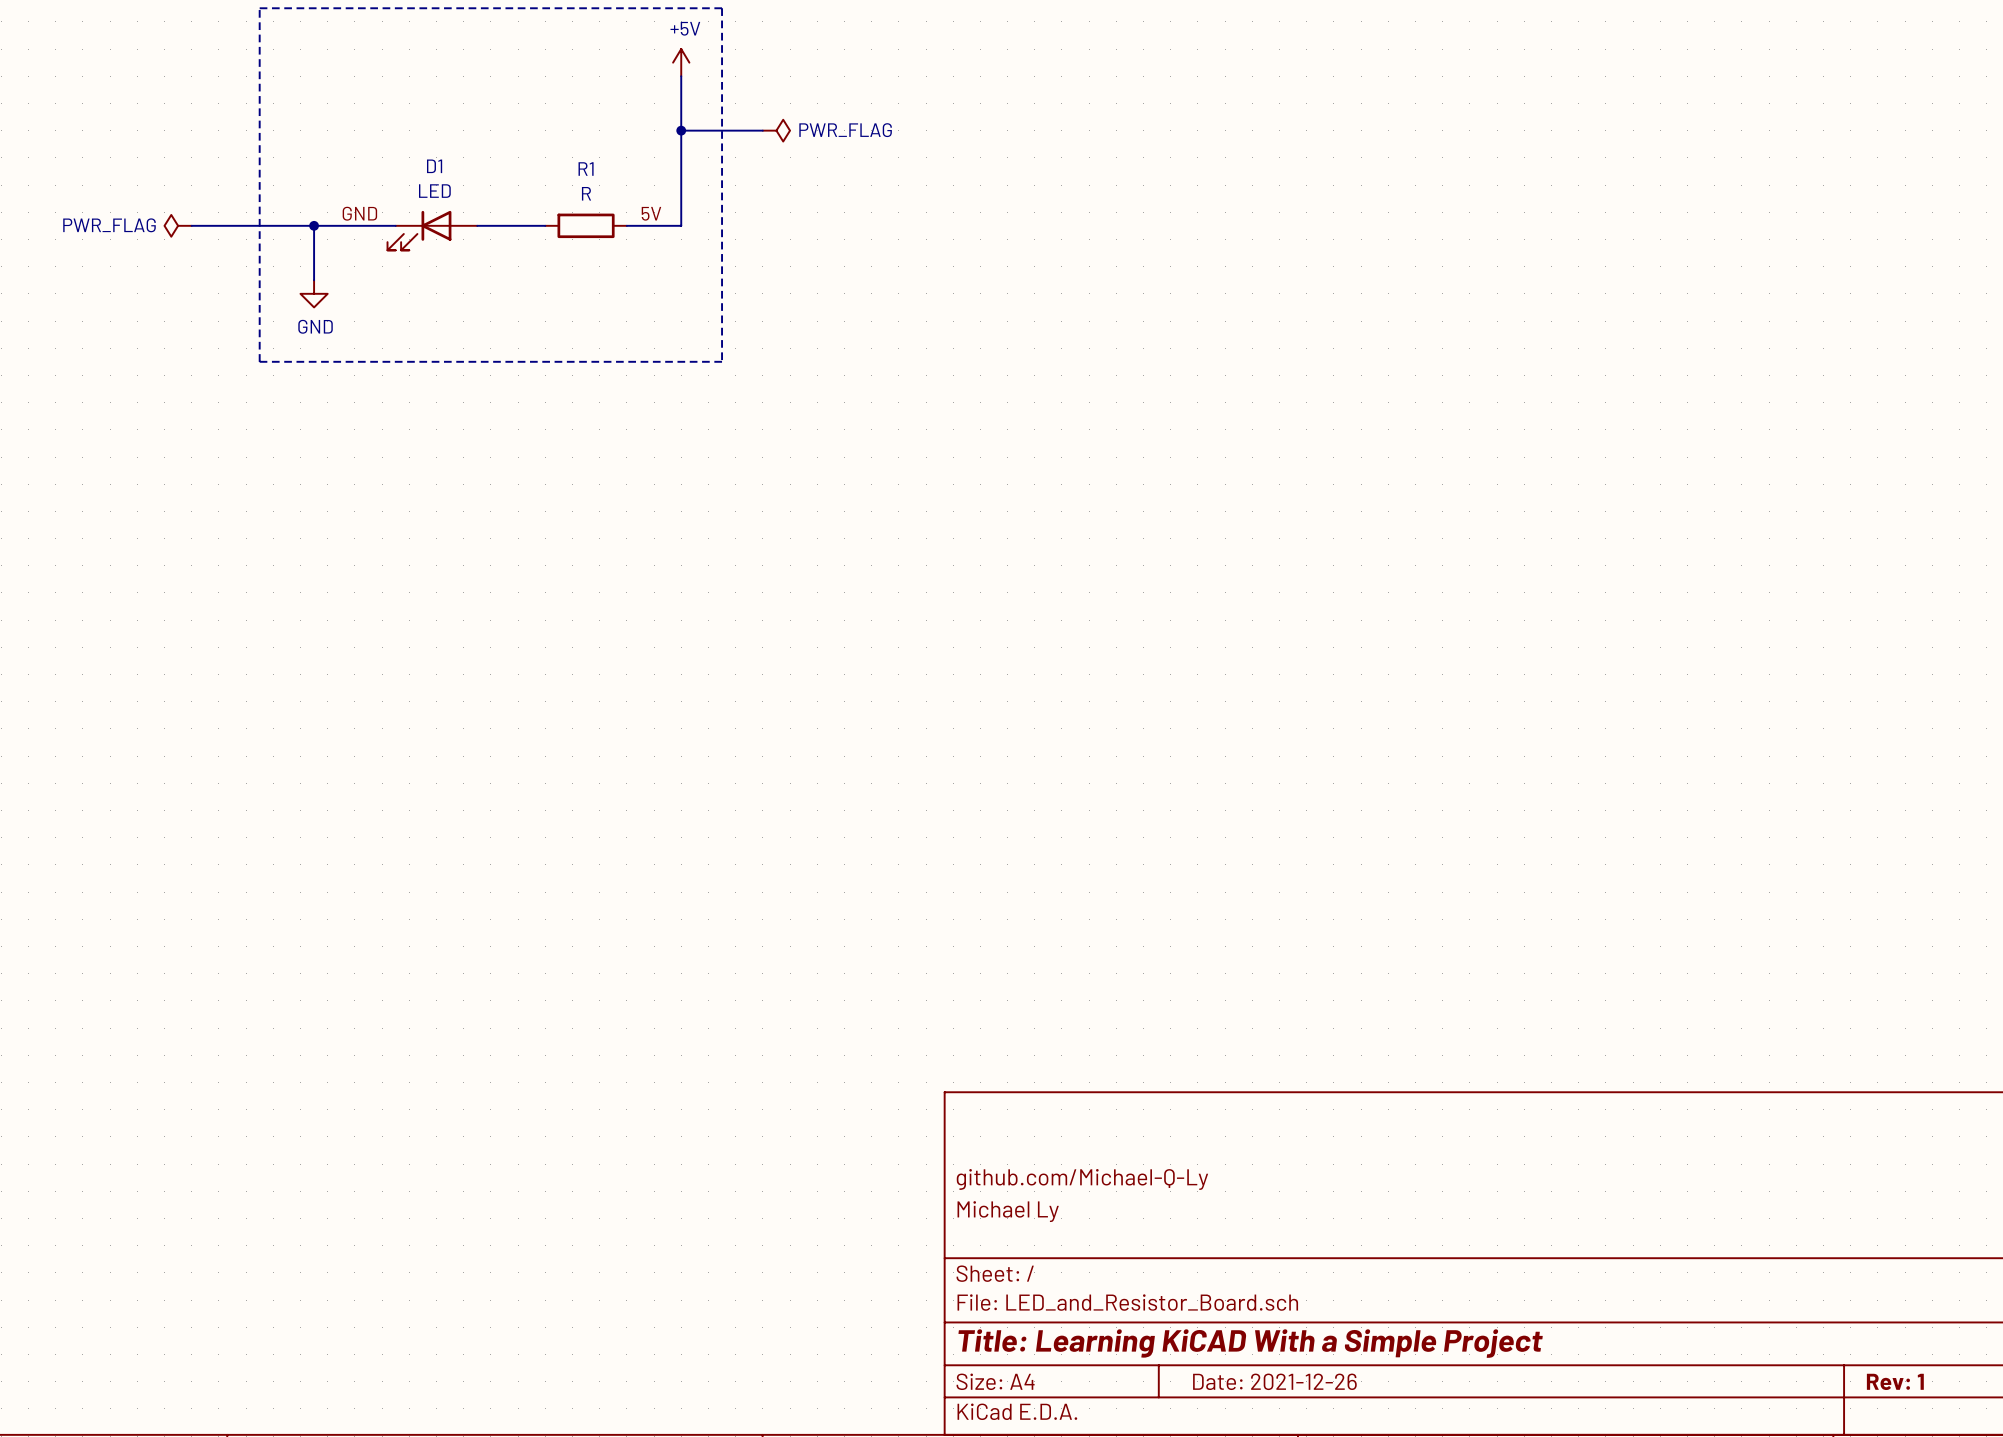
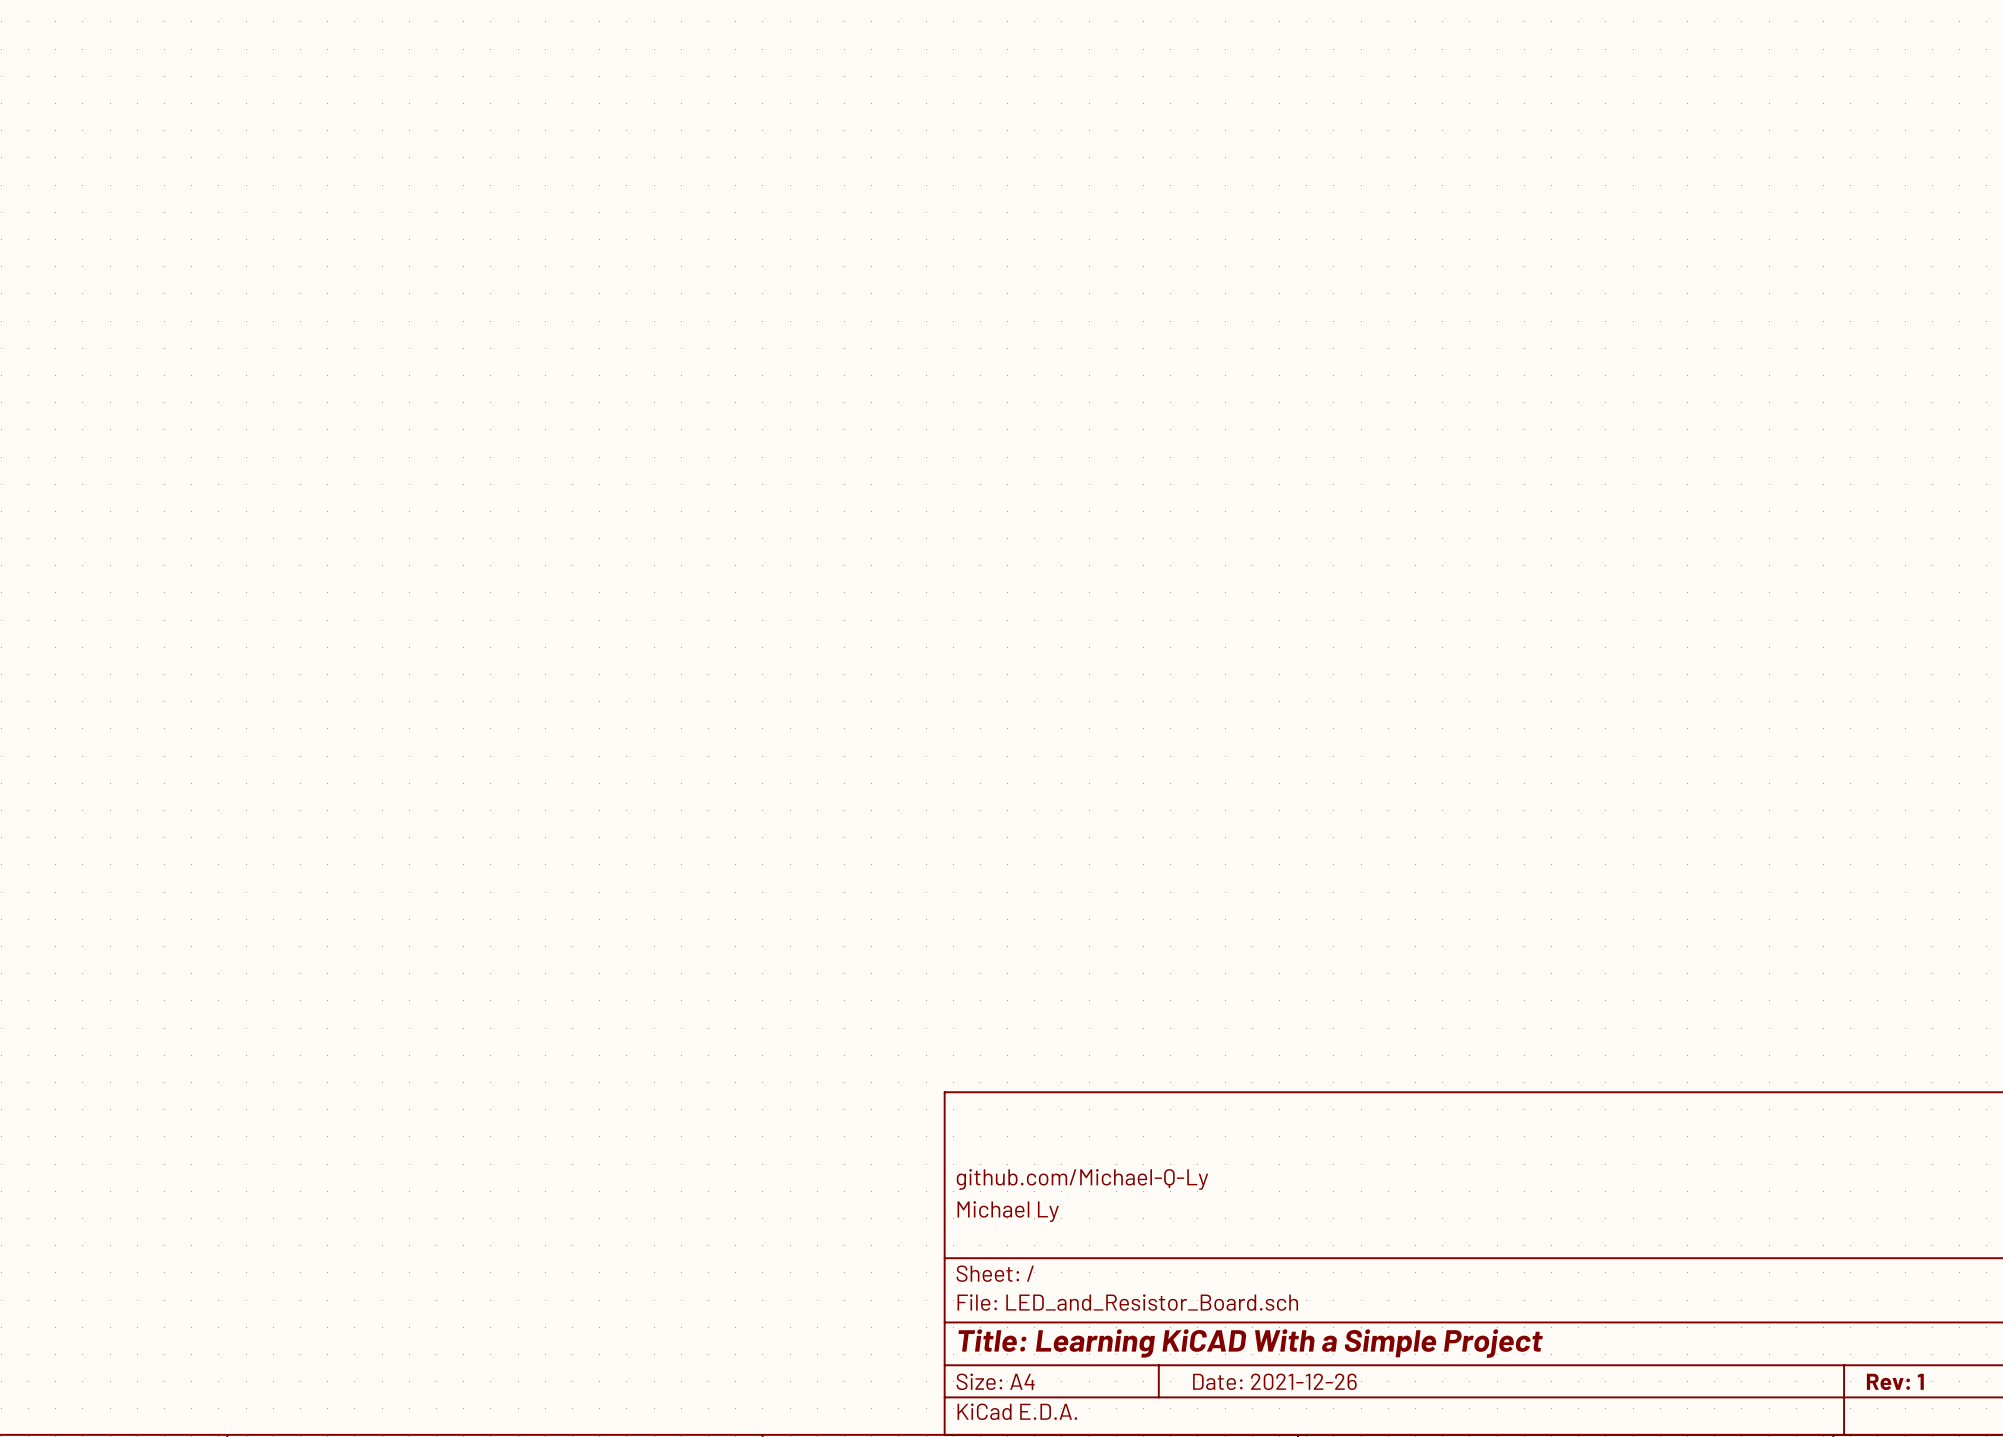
line: (259, 8) (722, 8) (722, 361) (259, 361) (259, 8) -> none
power symbol: +5V (681, 62) -> none
wire: (681, 76) (681, 225) (626, 225) -> none
wire: (681, 130) (762, 130) -> none
junction: (681, 130) -> none
power symbol: PWR_FLAG (776, 130) -> none
label: GND (359, 213) -> none
label: 5V (651, 213) -> none
power symbol: PWR_FLAG (178, 225) -> none
wire: (191, 225) (395, 225) -> none
wire: (314, 225) (314, 280) -> none
junction: (314, 225) -> none
wire: (477, 225) (545, 225) -> none
R1: R (586, 225) -> none
D1: LED (432, 230) -> none
power symbol: GND (314, 293) -> none

